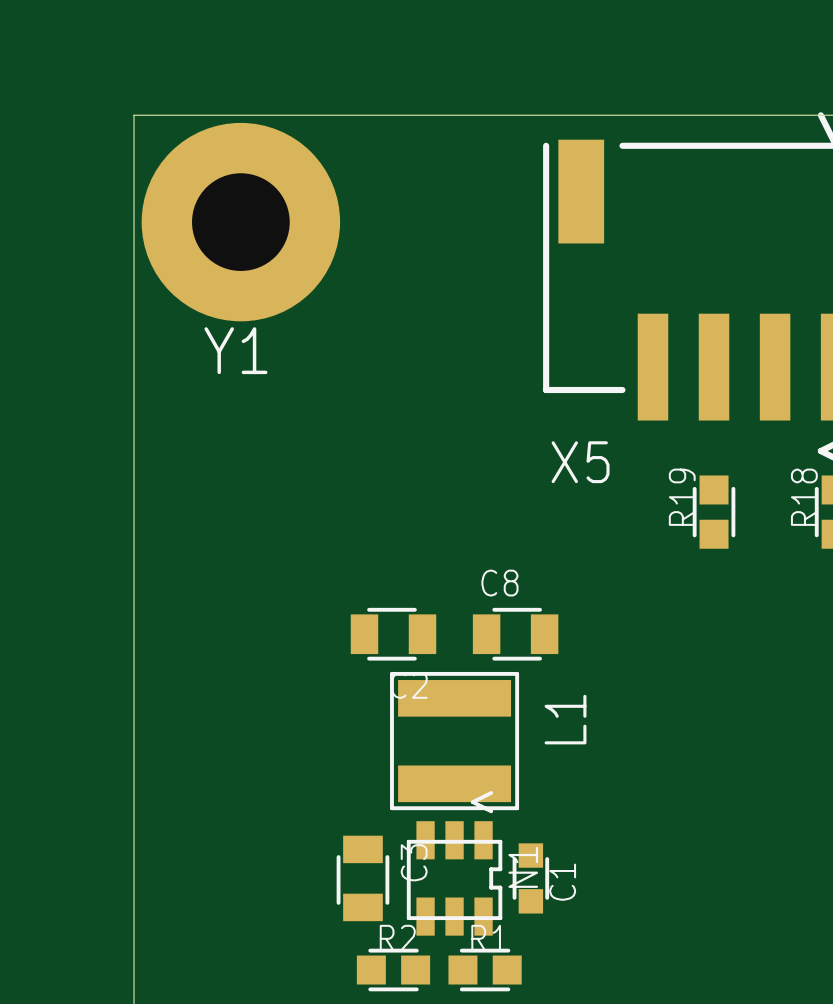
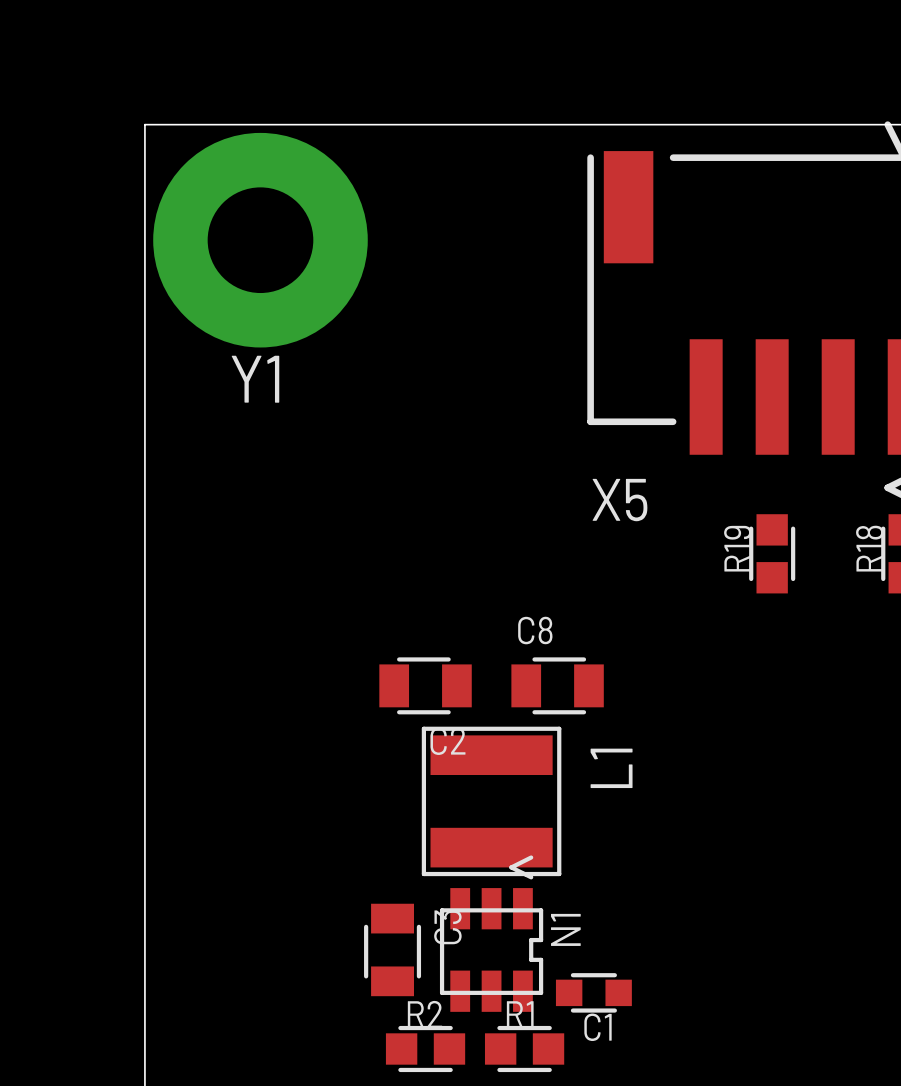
C1 rotation: 0° (530, 878) -> 90° clockwise (593, 992)
C1 position: (530, 878) -> (593, 992)

